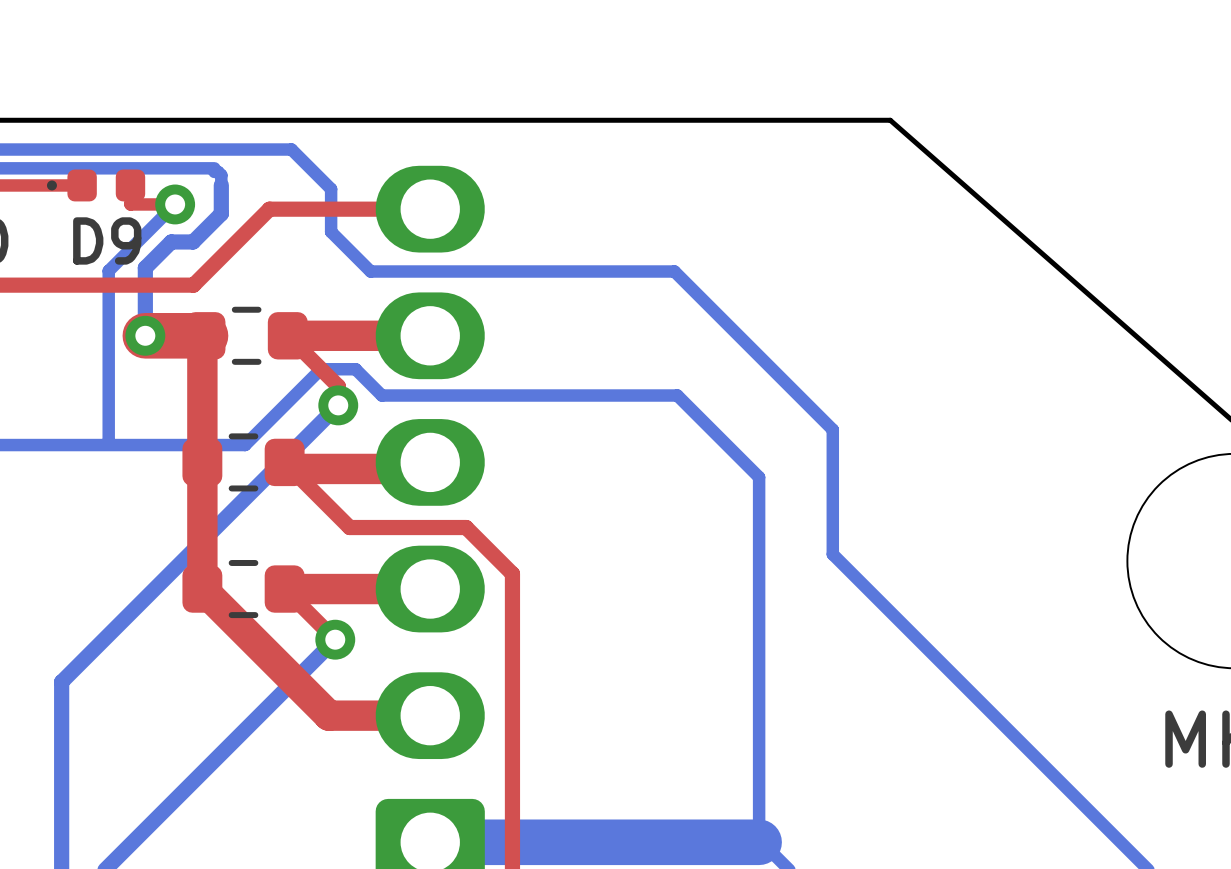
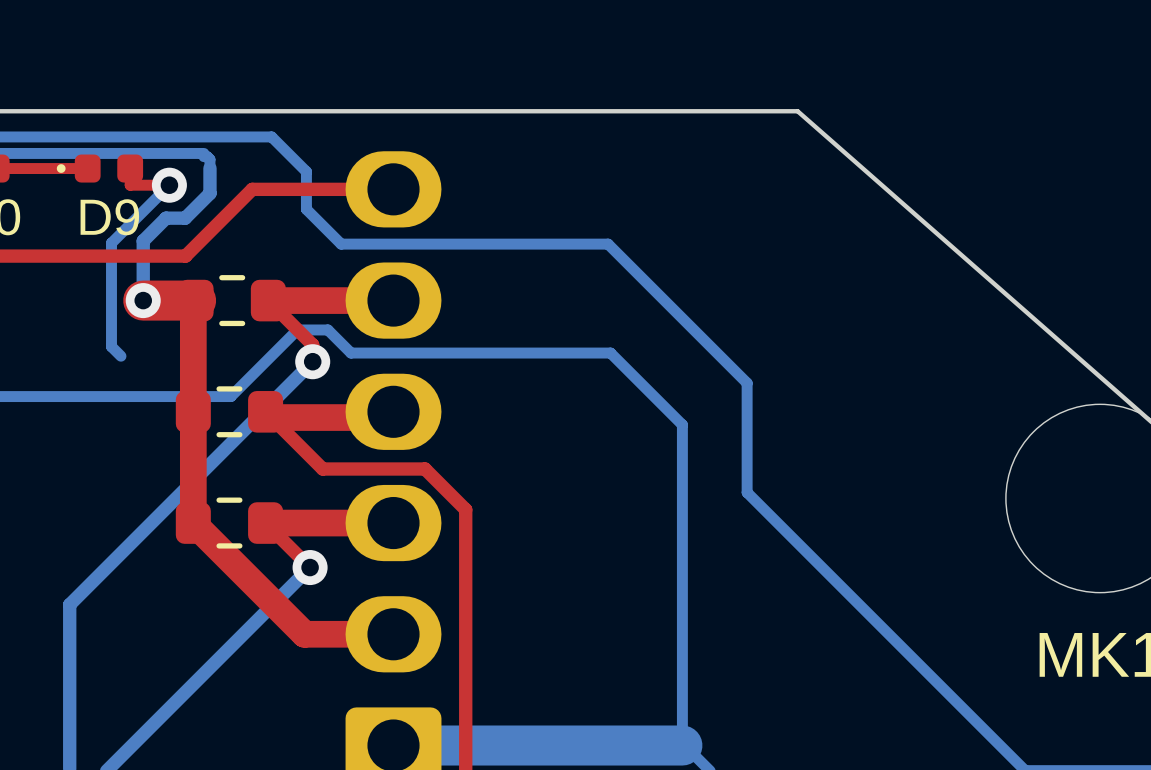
bottom track: (108, 270) (108, 444) -> (111, 243) (111, 346) (120, 356)

